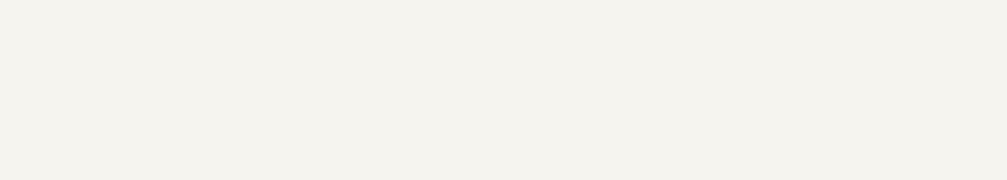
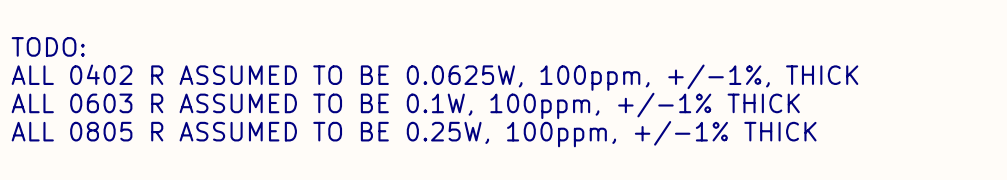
text: none -> TODO: (48, 46)
text: none -> ALL 0402 R ASSUMED TO BE 0.0625W, 100ppm, +/-1%, THICK (434, 77)
text: none -> ALL 0603 R ASSUMED TO BE 0.1W, 100ppm, +/-1% THICK (405, 105)
text: none -> ALL 0805 R ASSUMED TO BE 0.25W, 100ppm, +/-1% THICK (414, 134)

